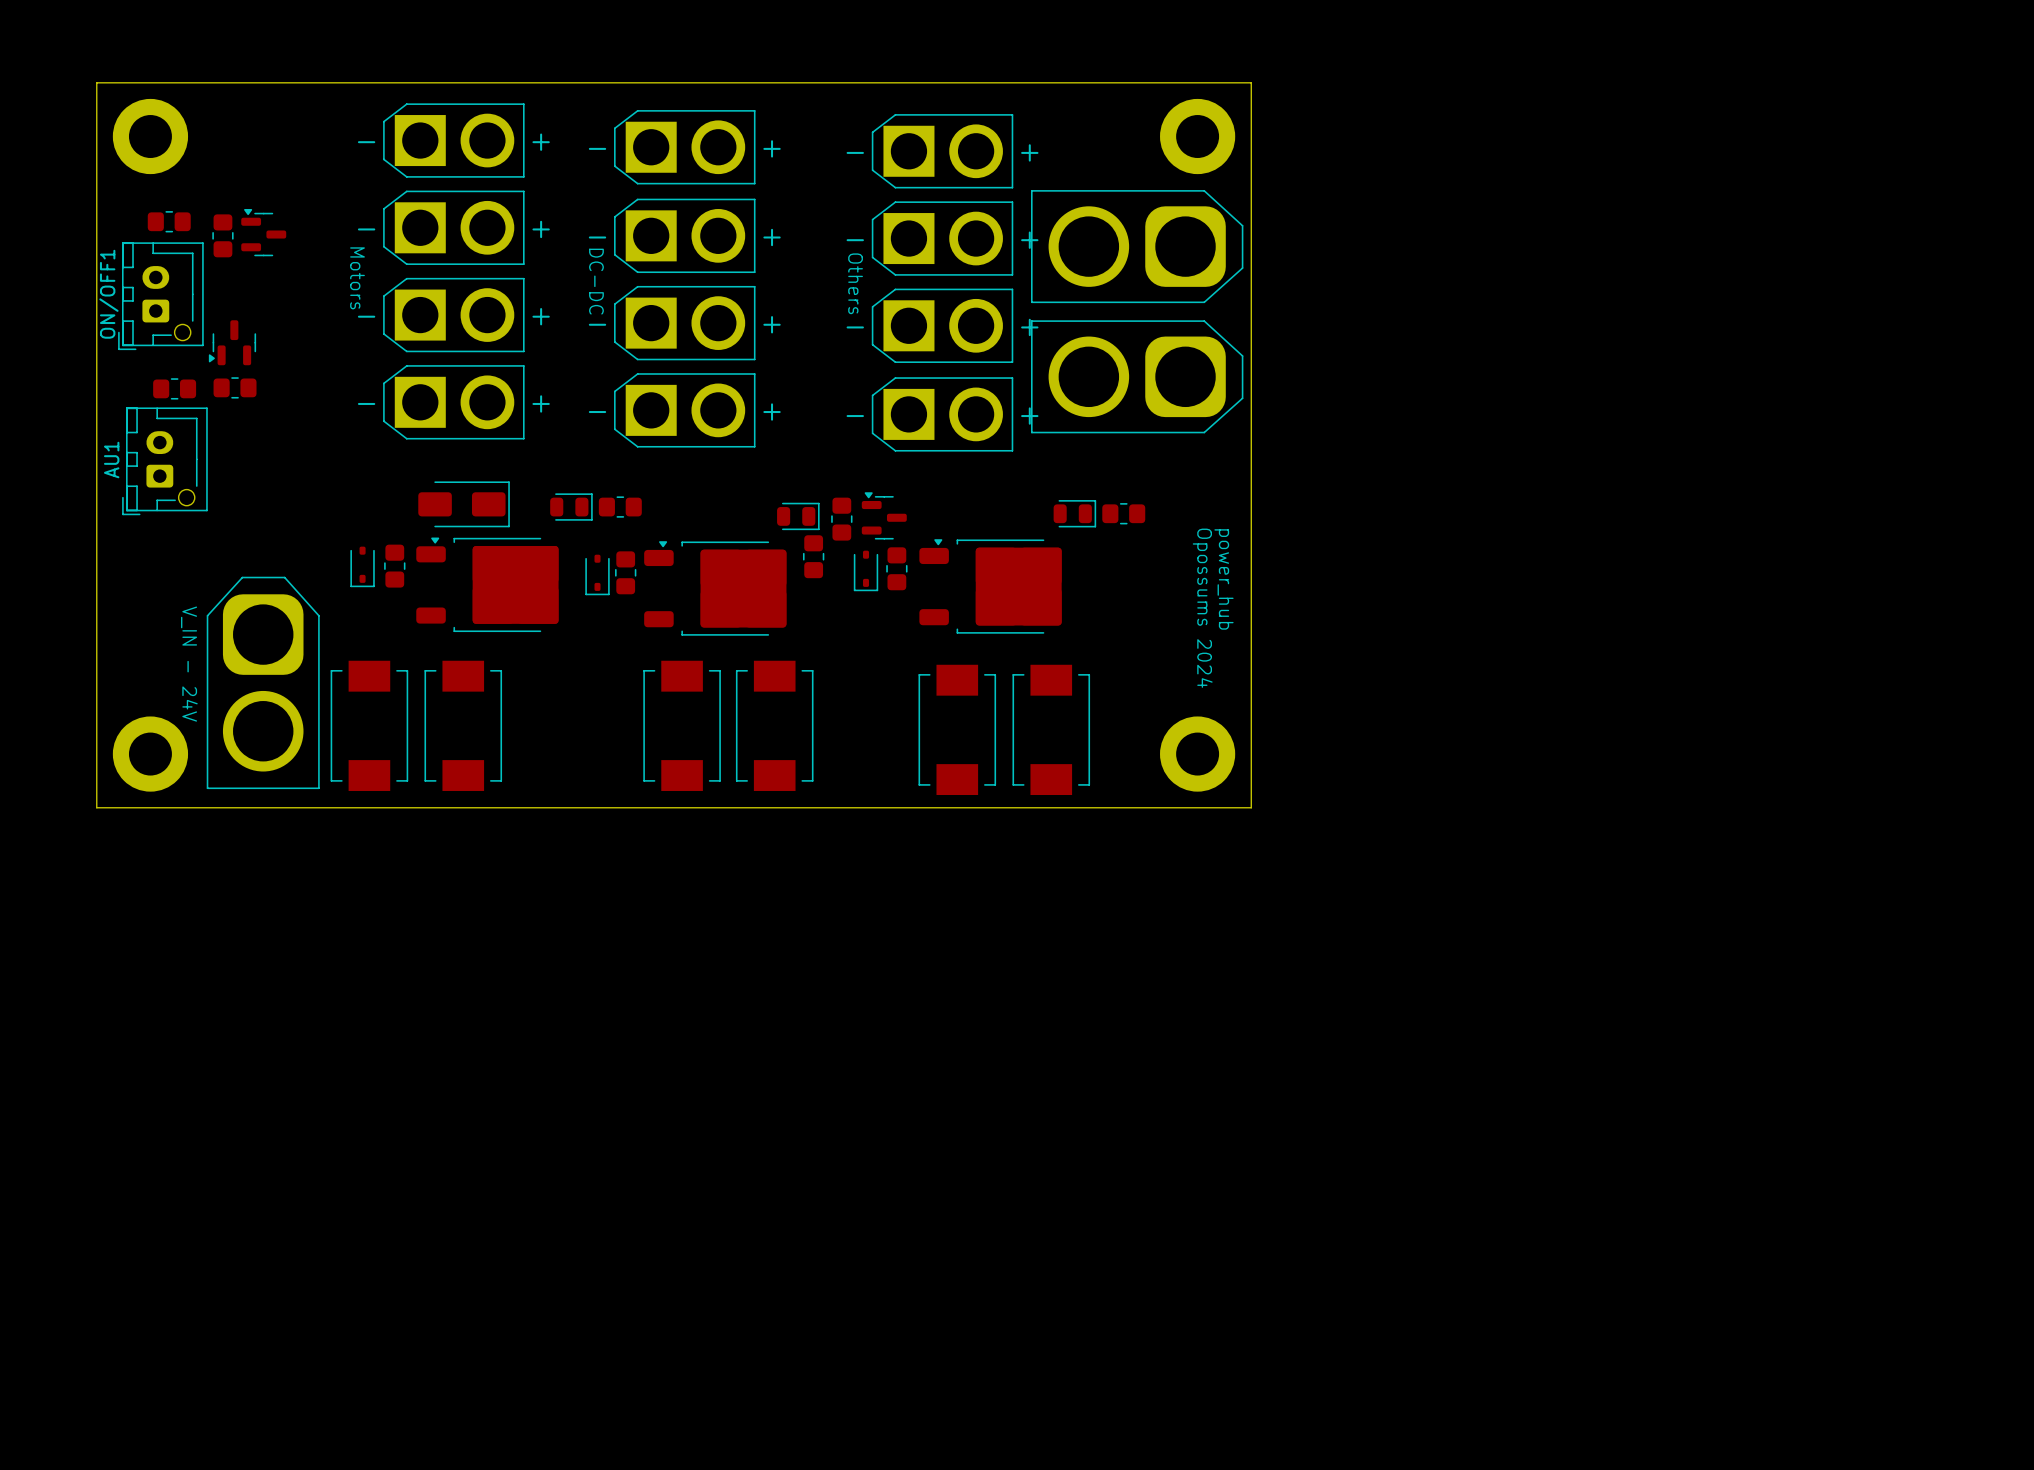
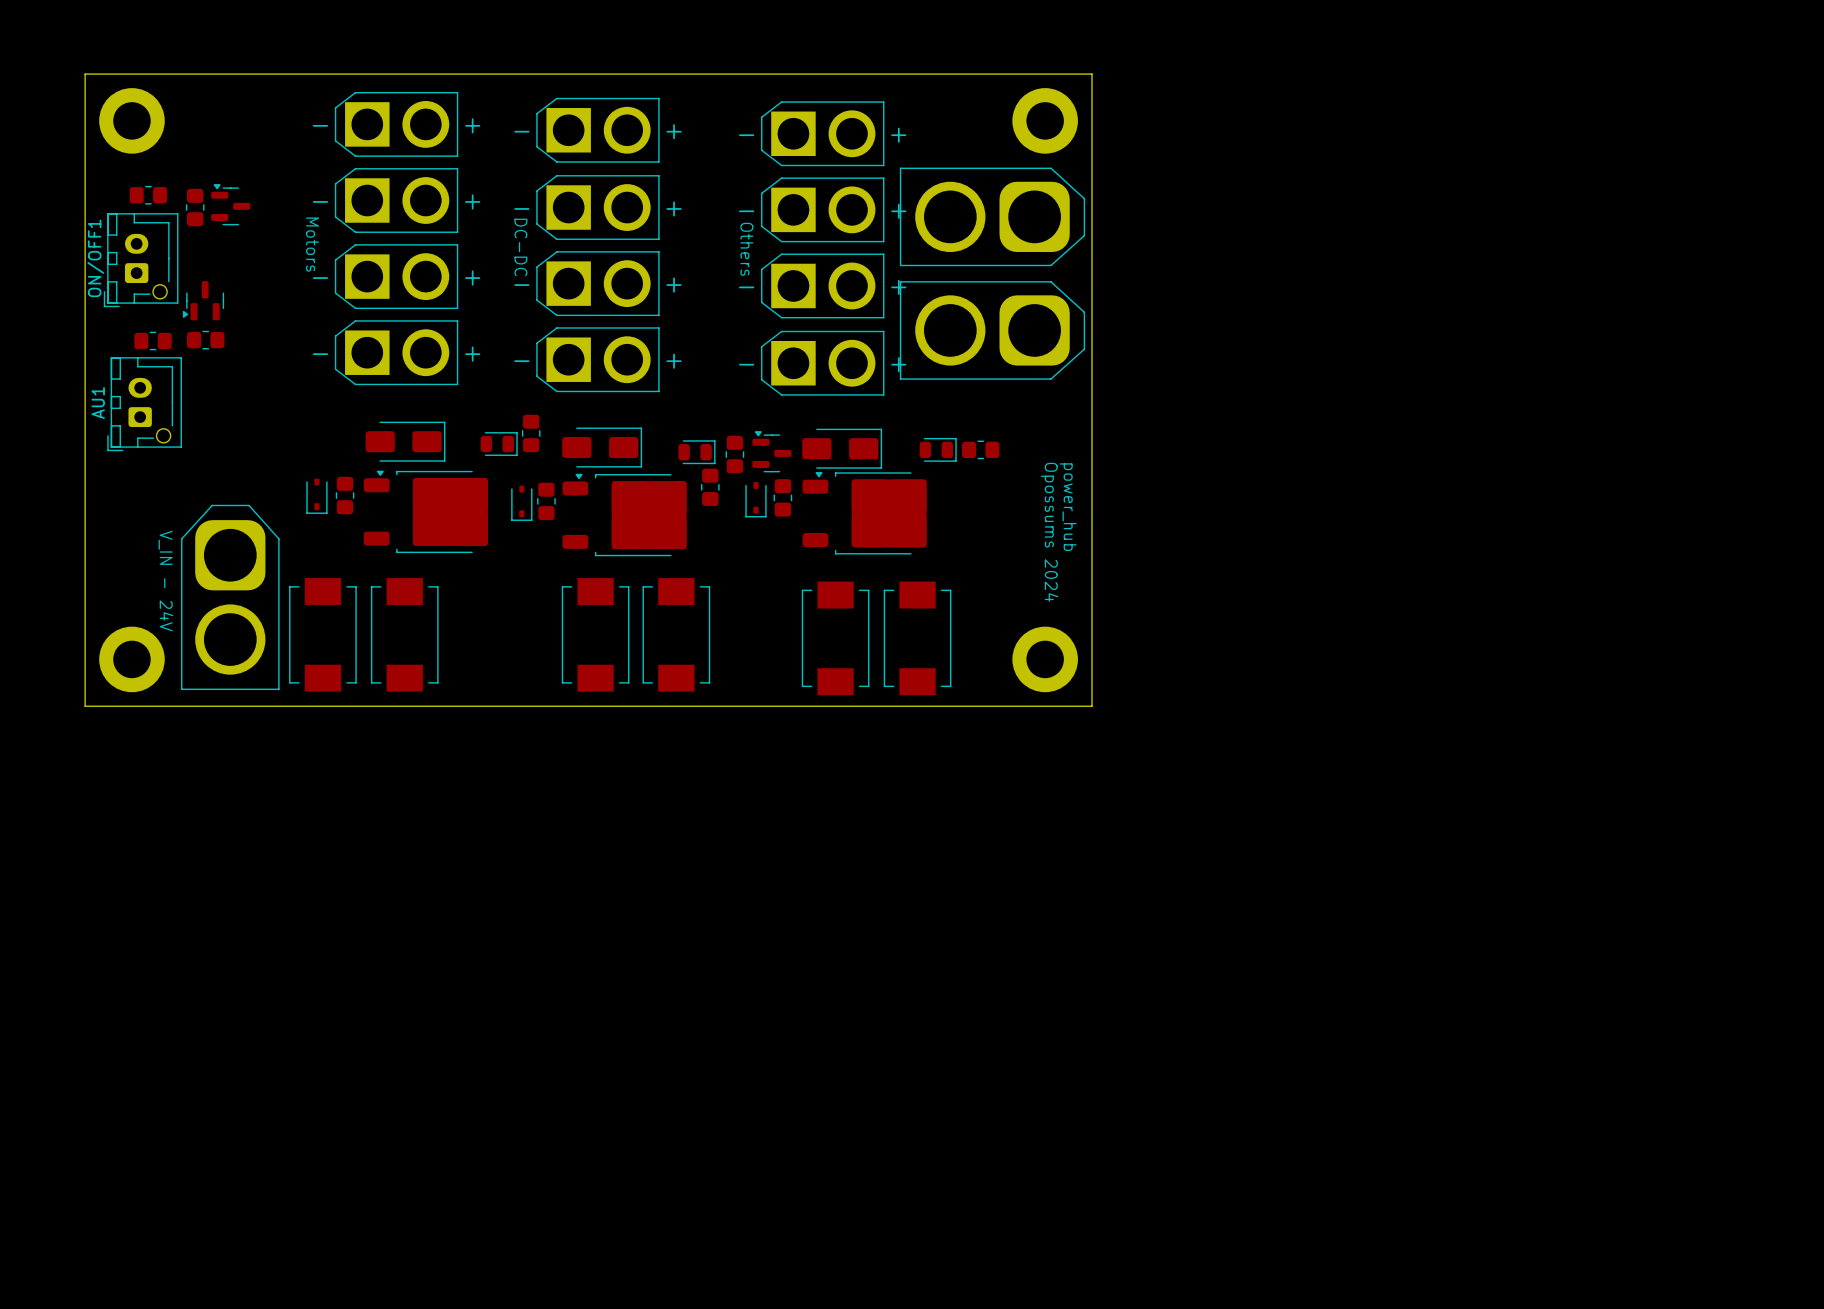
part rotation: 0° (620, 507) -> 90° clockwise (531, 433)
part: none -> (602, 447)
part: none -> (842, 448)

